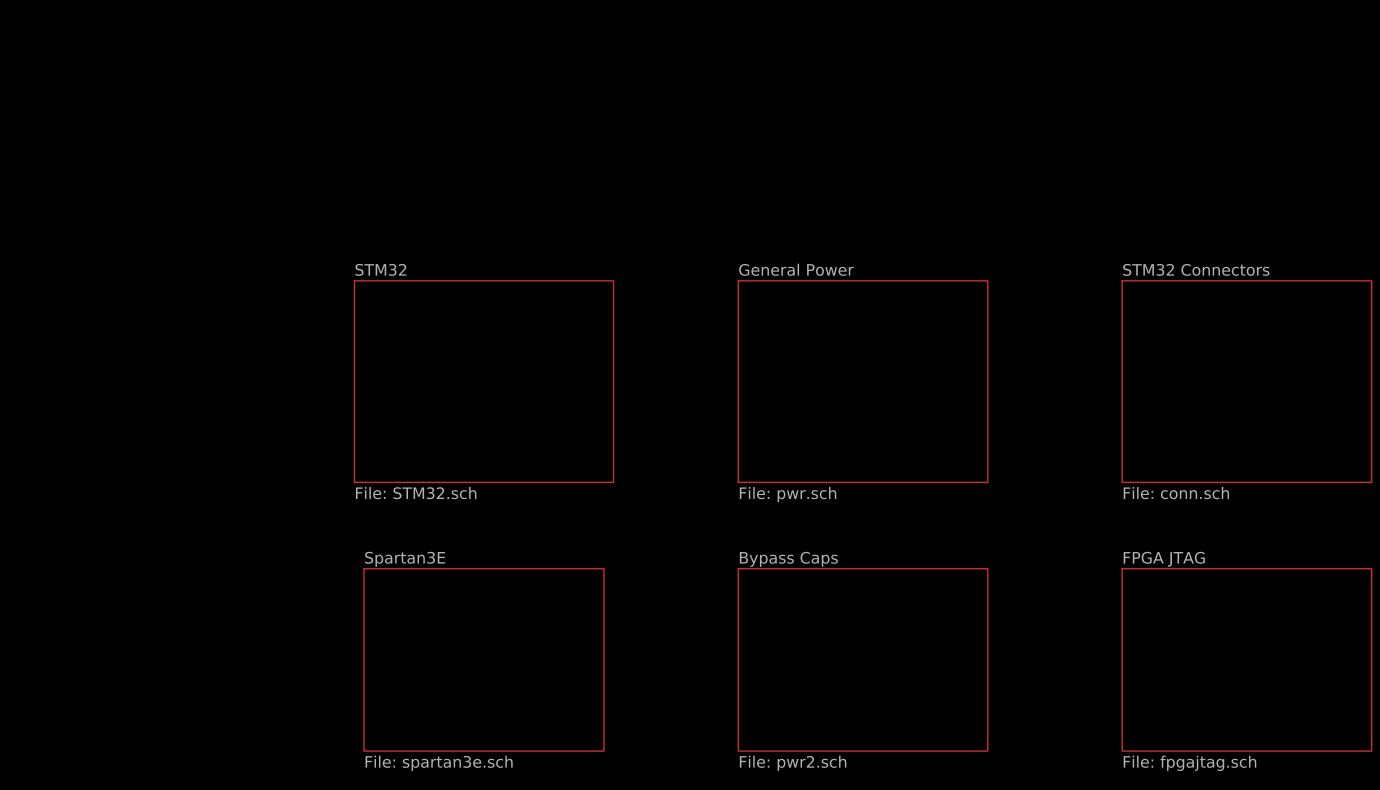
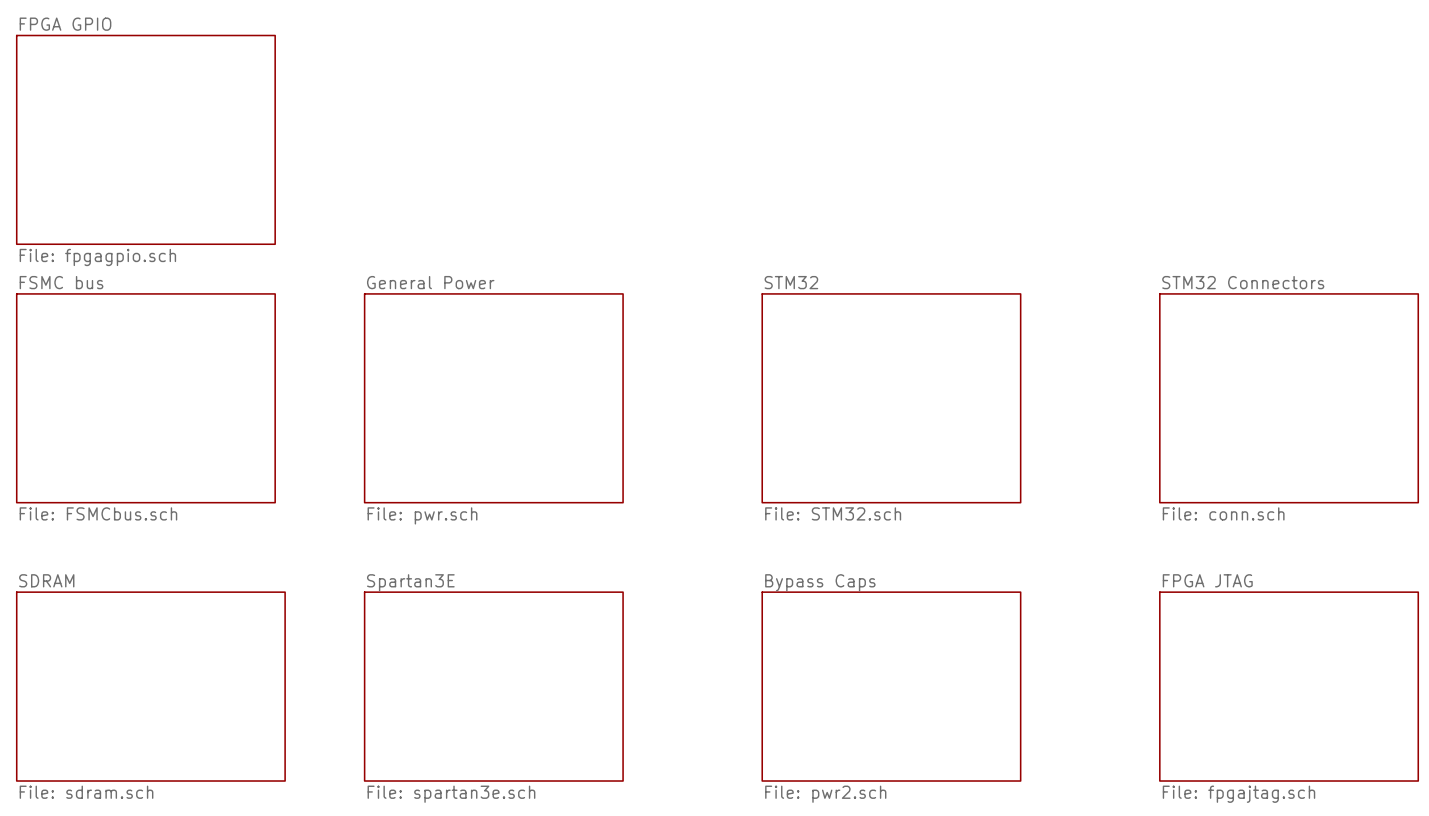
sheet FPGA GPIO: none -> File: fpgagpio.sch (145, 139)
sheet General Power name: General Power (796, 269) -> STM32 (791, 282)
sheet FSMC bus: none -> File: FSMCbus.sch (145, 398)
sheet General Power: none -> File: pwr.sch (493, 398)
sheet STM32: File: STM32.sch (483, 381) -> none
sheet General Power value: File: pwr.sch (788, 494) -> File: STM32.sch (833, 513)
sheet Spartan3E shape: [364, 568, 604, 752] -> [364, 592, 624, 782]
sheet SDRAM: none -> File: sdram.sch (150, 686)

